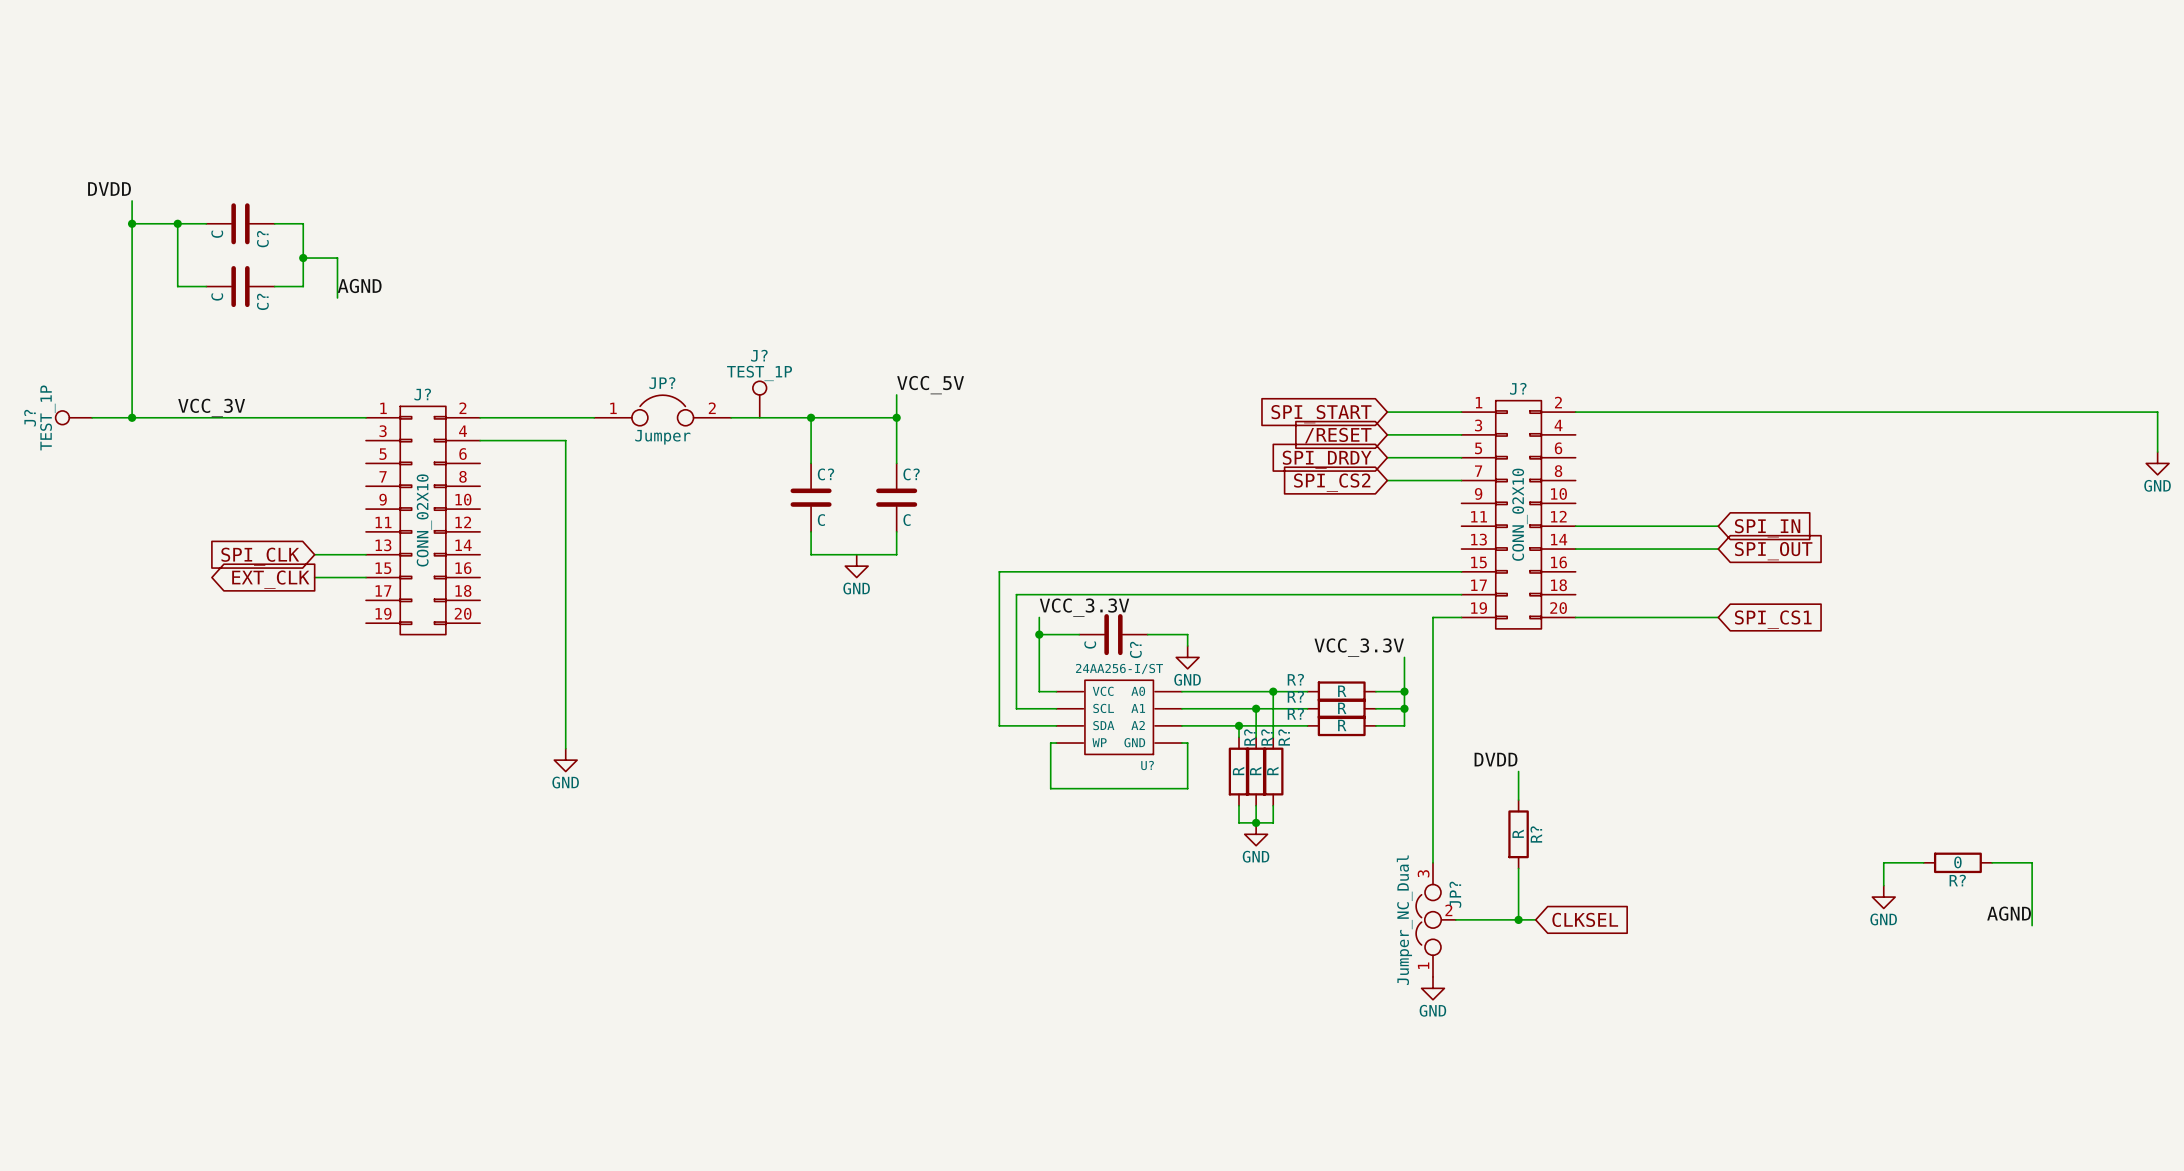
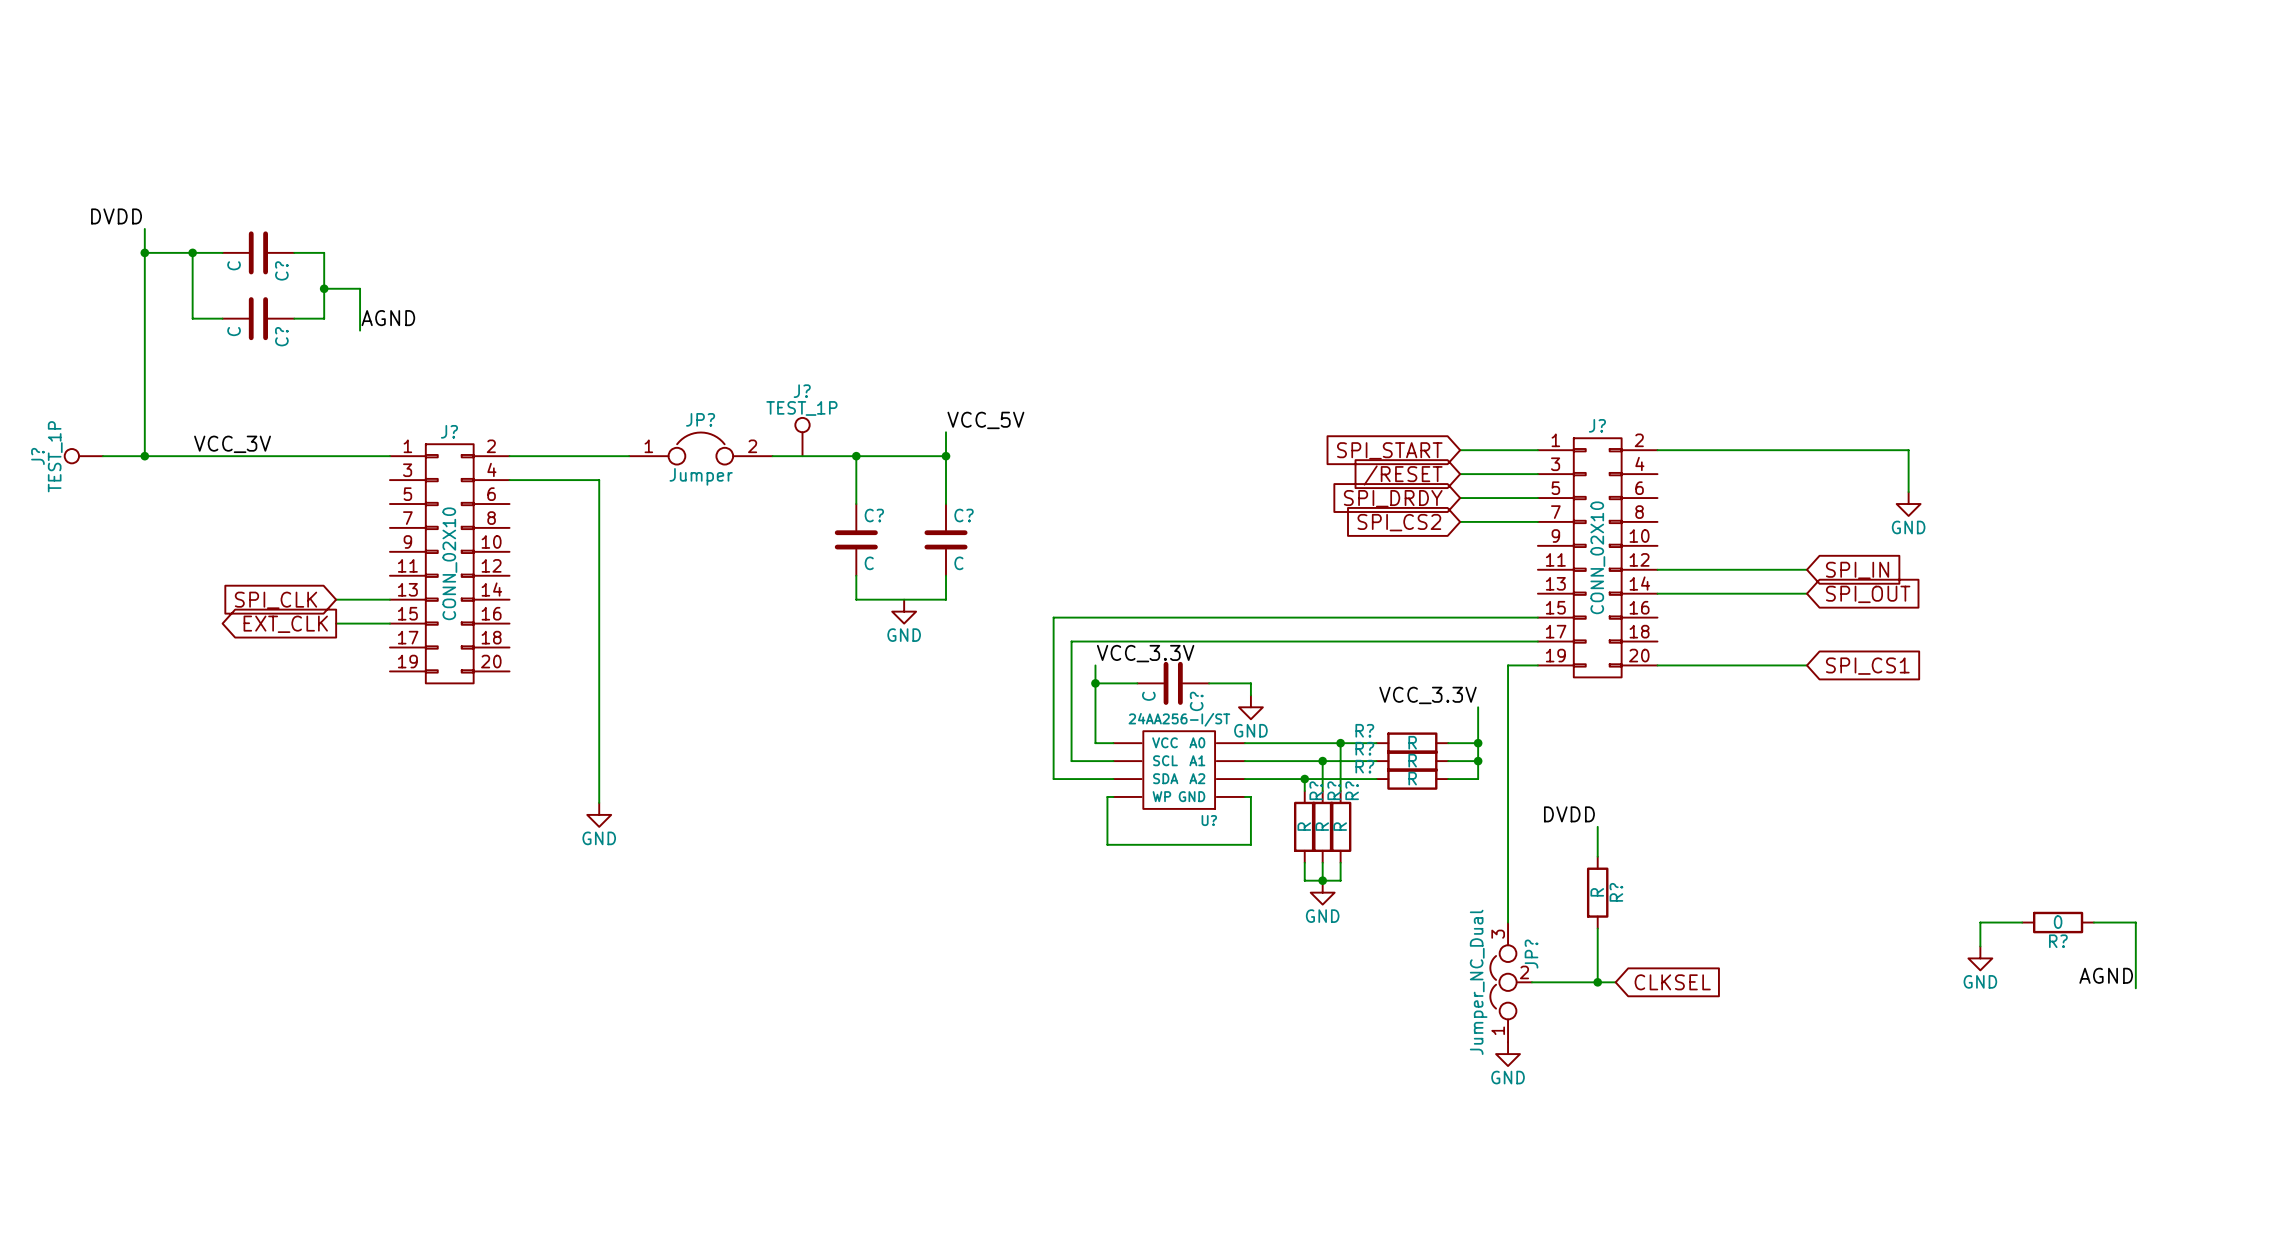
wire: (1815, 412) (2157, 412) (2157, 452) -> (1908, 450) (1908, 492)
power symbol: none -> GND (1908, 504)
power symbol: GND (2157, 463) -> none

